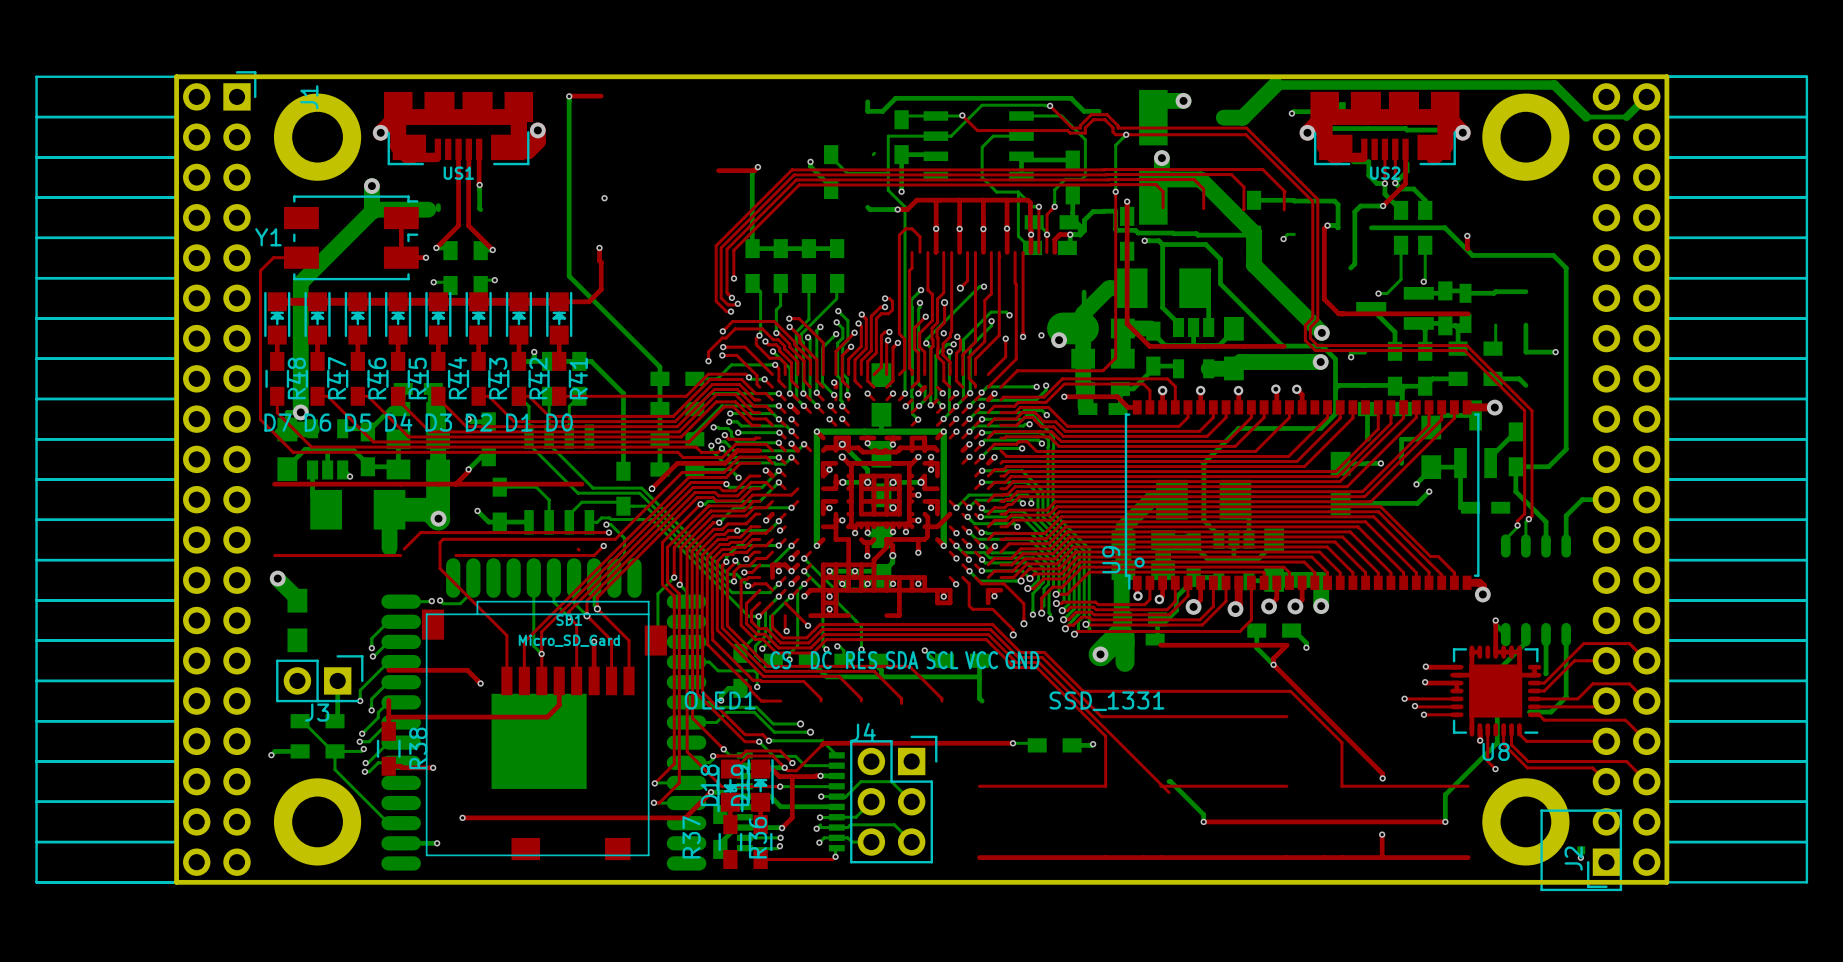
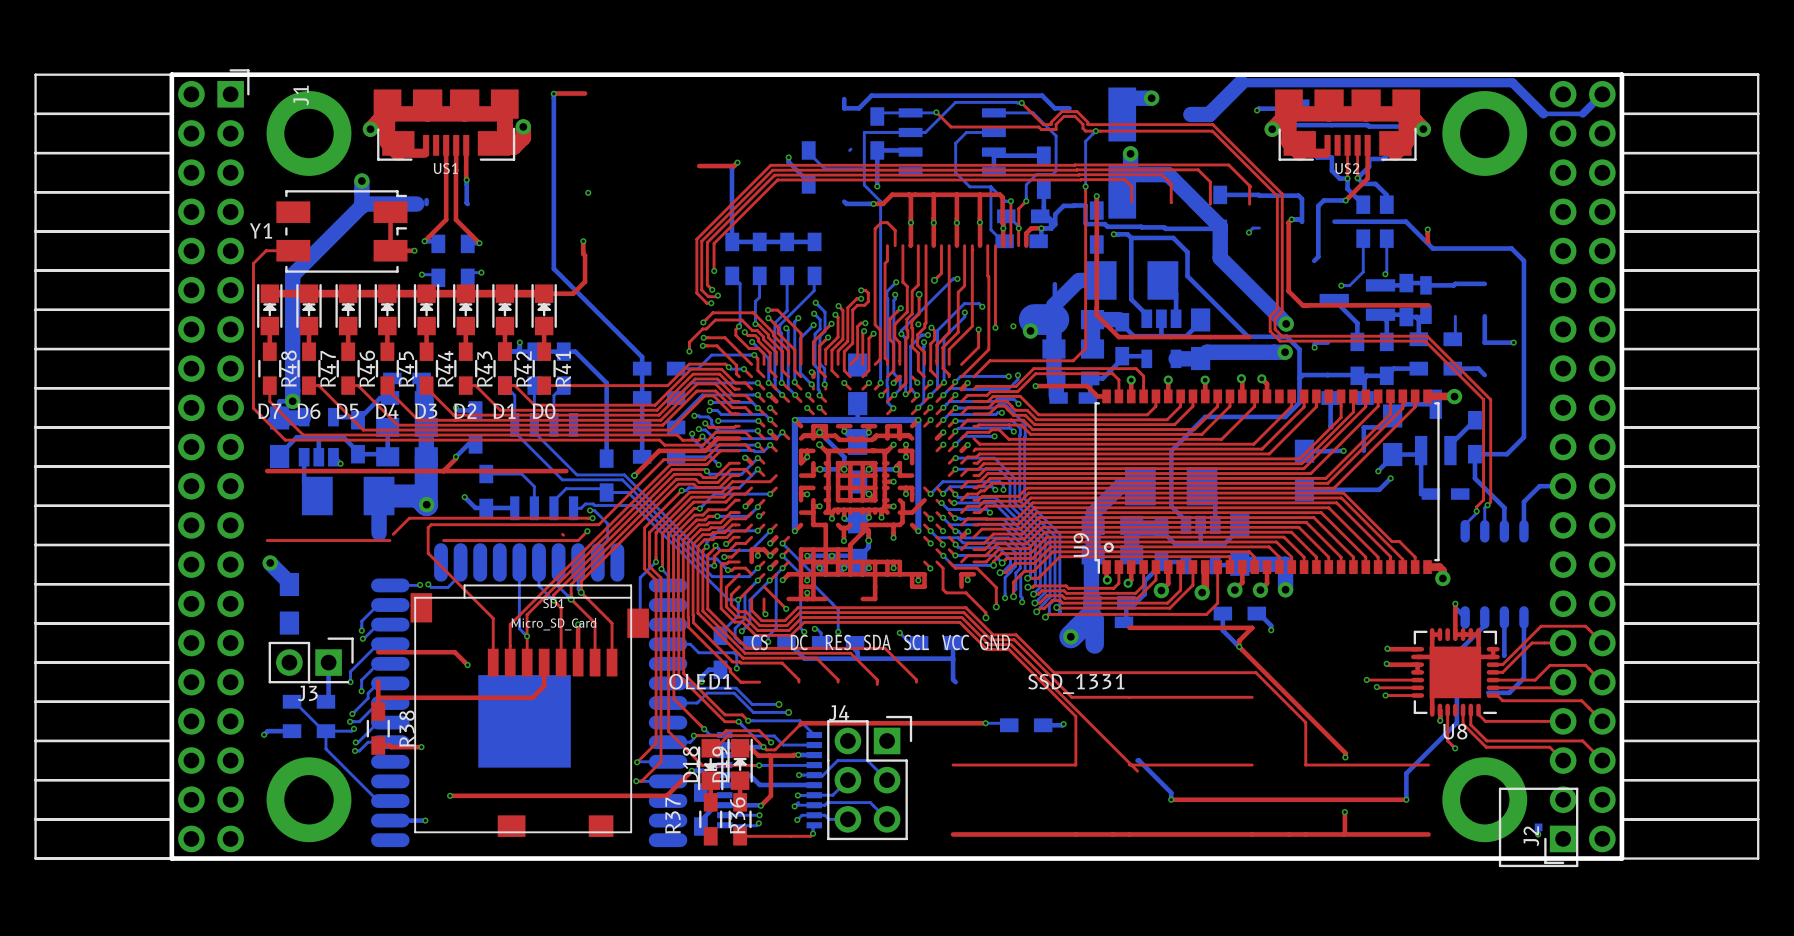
bottom track: none -> (1398, 143) (1383, 158) (1369, 158)

